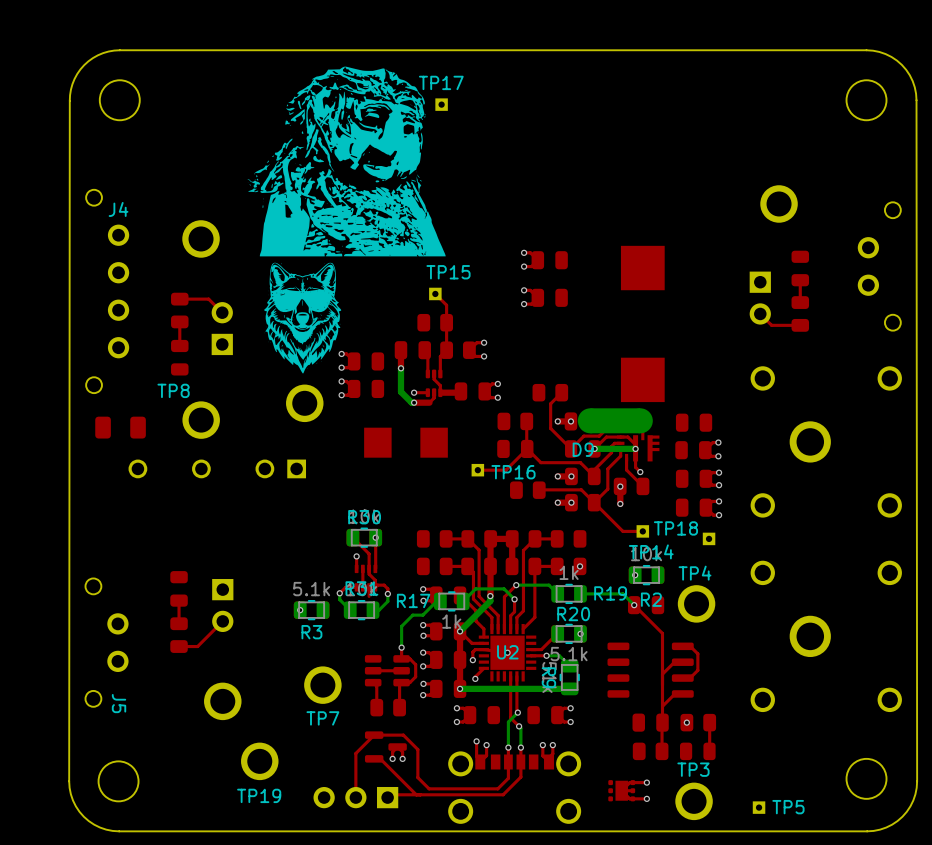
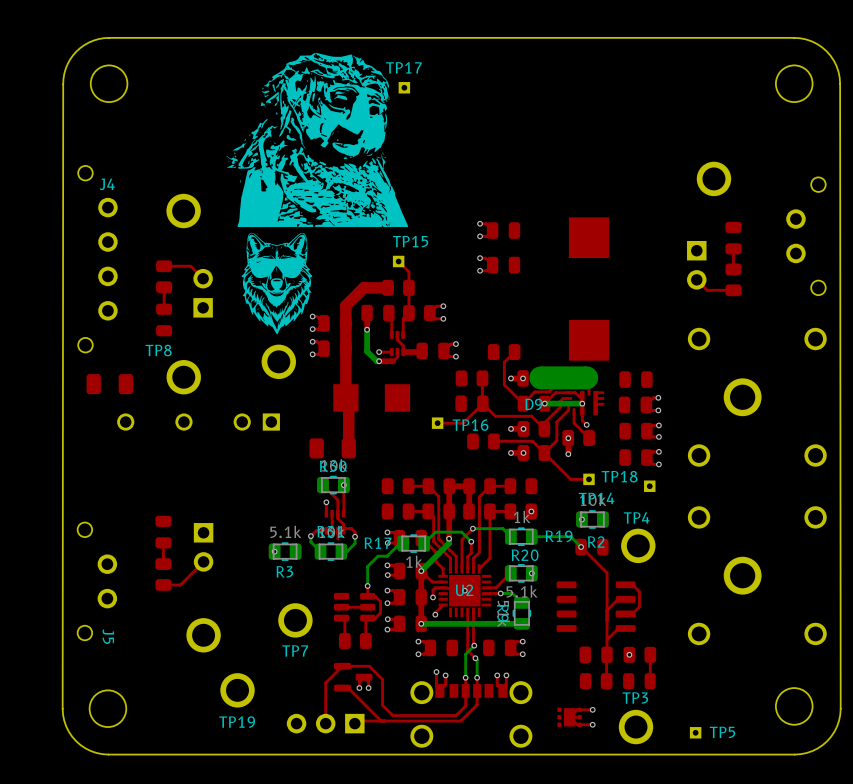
top track: none -> (388, 287) (363, 287) (345, 305) (345, 397) (348, 400) (348, 448)
part: none -> (332, 448)

